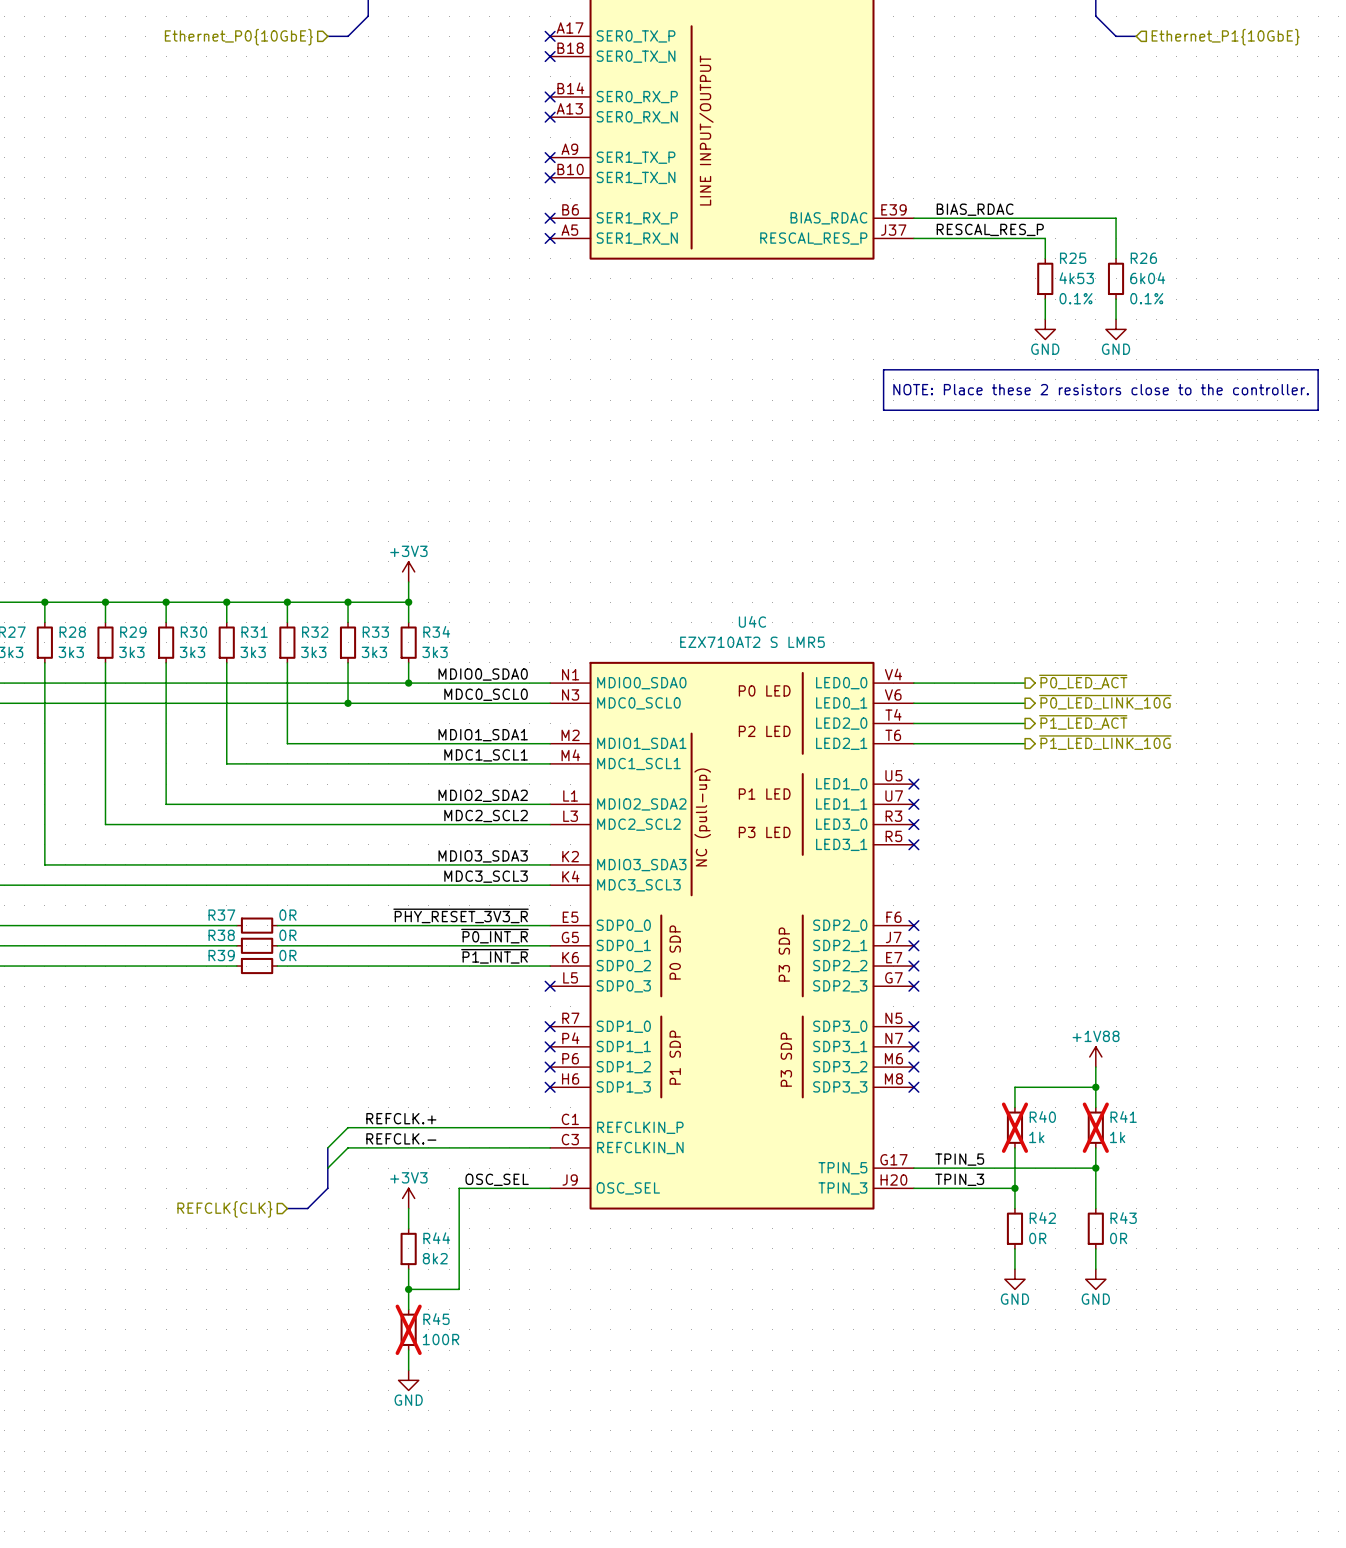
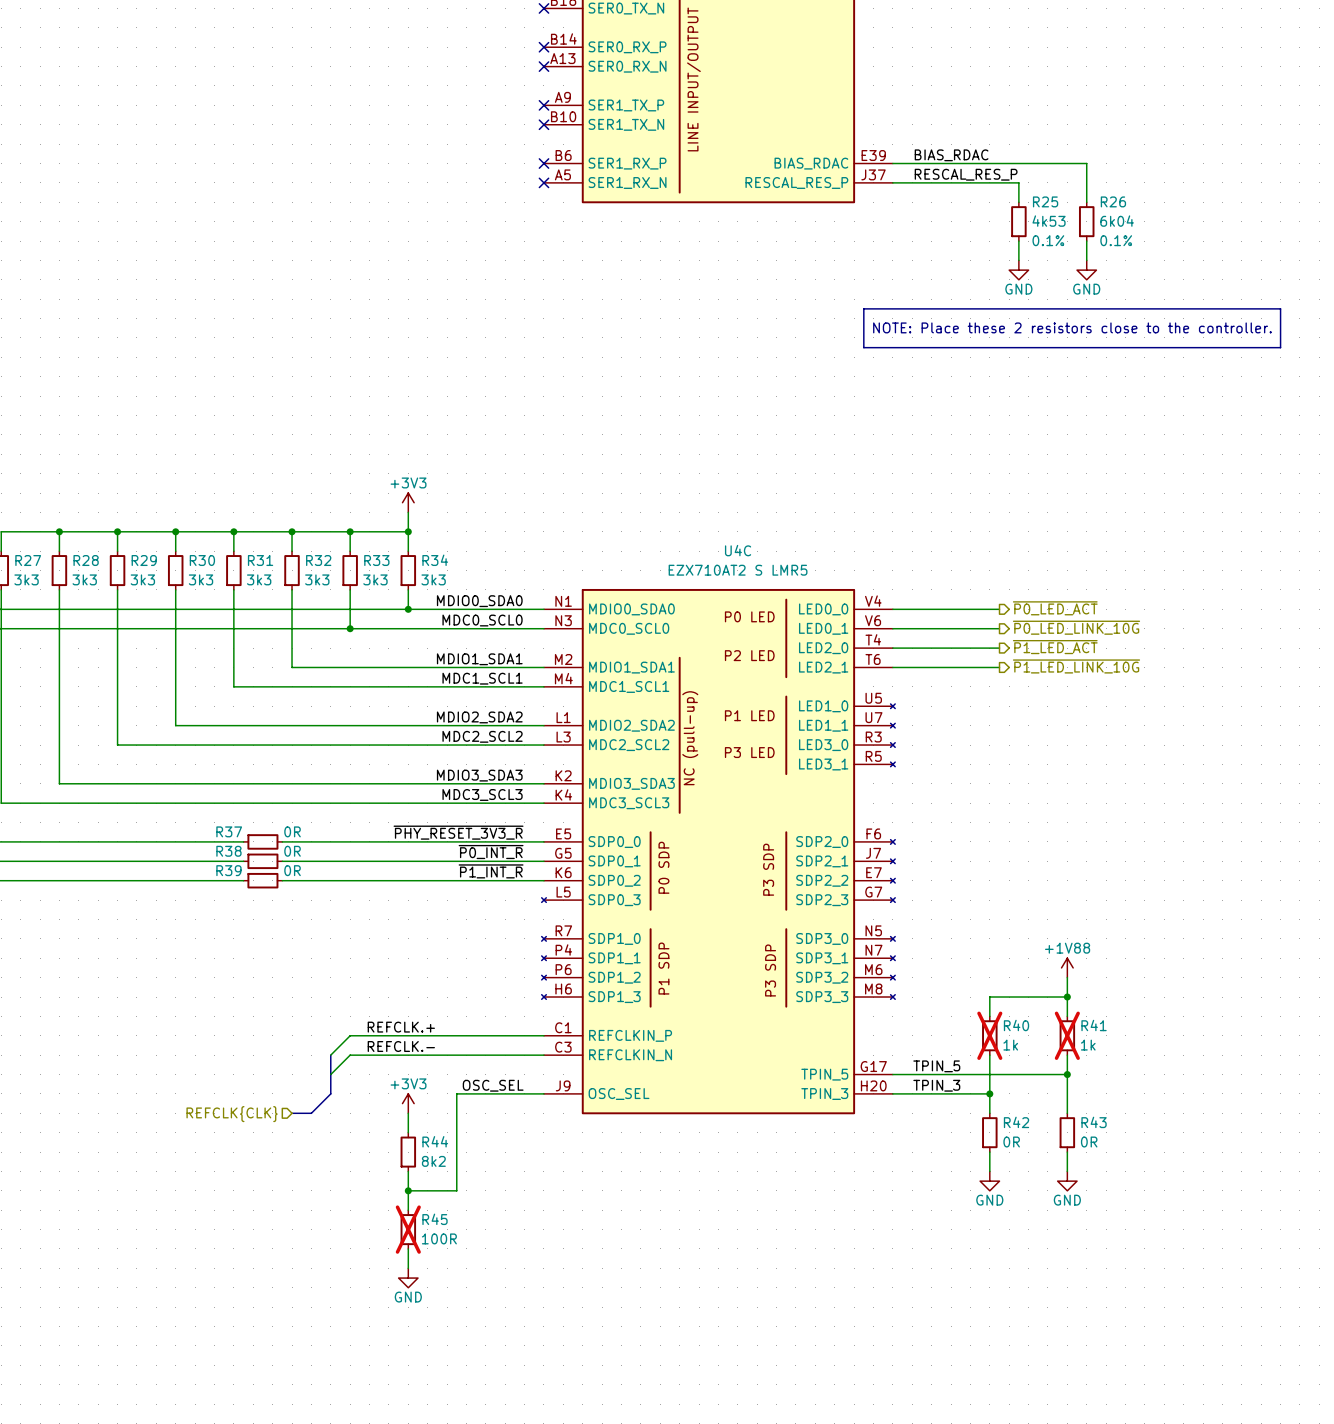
U4C symbol: [550, 661, 914, 1210] -> [541, 588, 896, 1115]
no-connect mark: (913, 784) -> none
no-connect mark: (913, 804) -> none
no-connect mark: (913, 824) -> none
no-connect mark: (913, 844) -> none
no-connect mark: (913, 925) -> none
no-connect mark: (913, 945) -> none
no-connect mark: (913, 966) -> none
no-connect mark: (550, 986) -> none
no-connect mark: (913, 986) -> none
no-connect mark: (550, 1026) -> none
no-connect mark: (913, 1026) -> none
no-connect mark: (550, 1046) -> none
no-connect mark: (913, 1046) -> none
no-connect mark: (550, 1067) -> none
no-connect mark: (913, 1067) -> none
no-connect mark: (550, 1087) -> none
no-connect mark: (913, 1087) -> none

